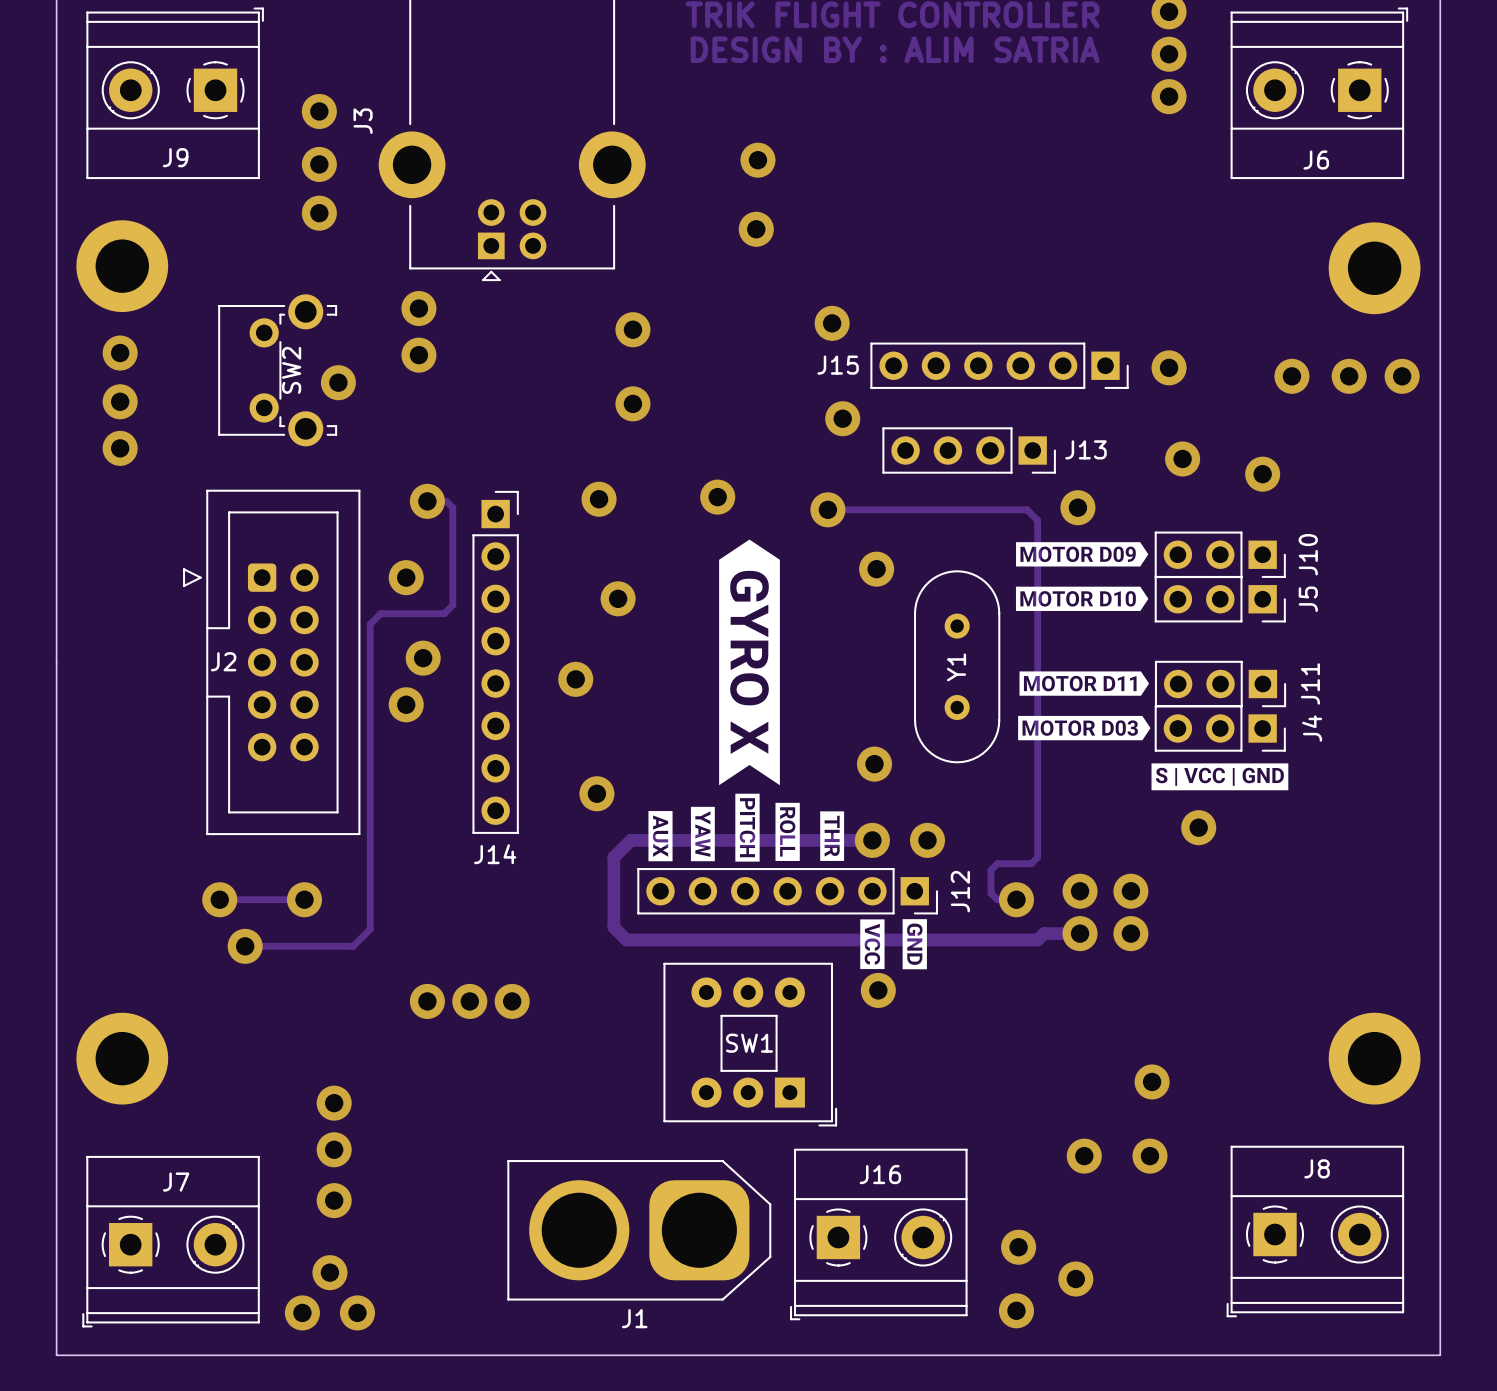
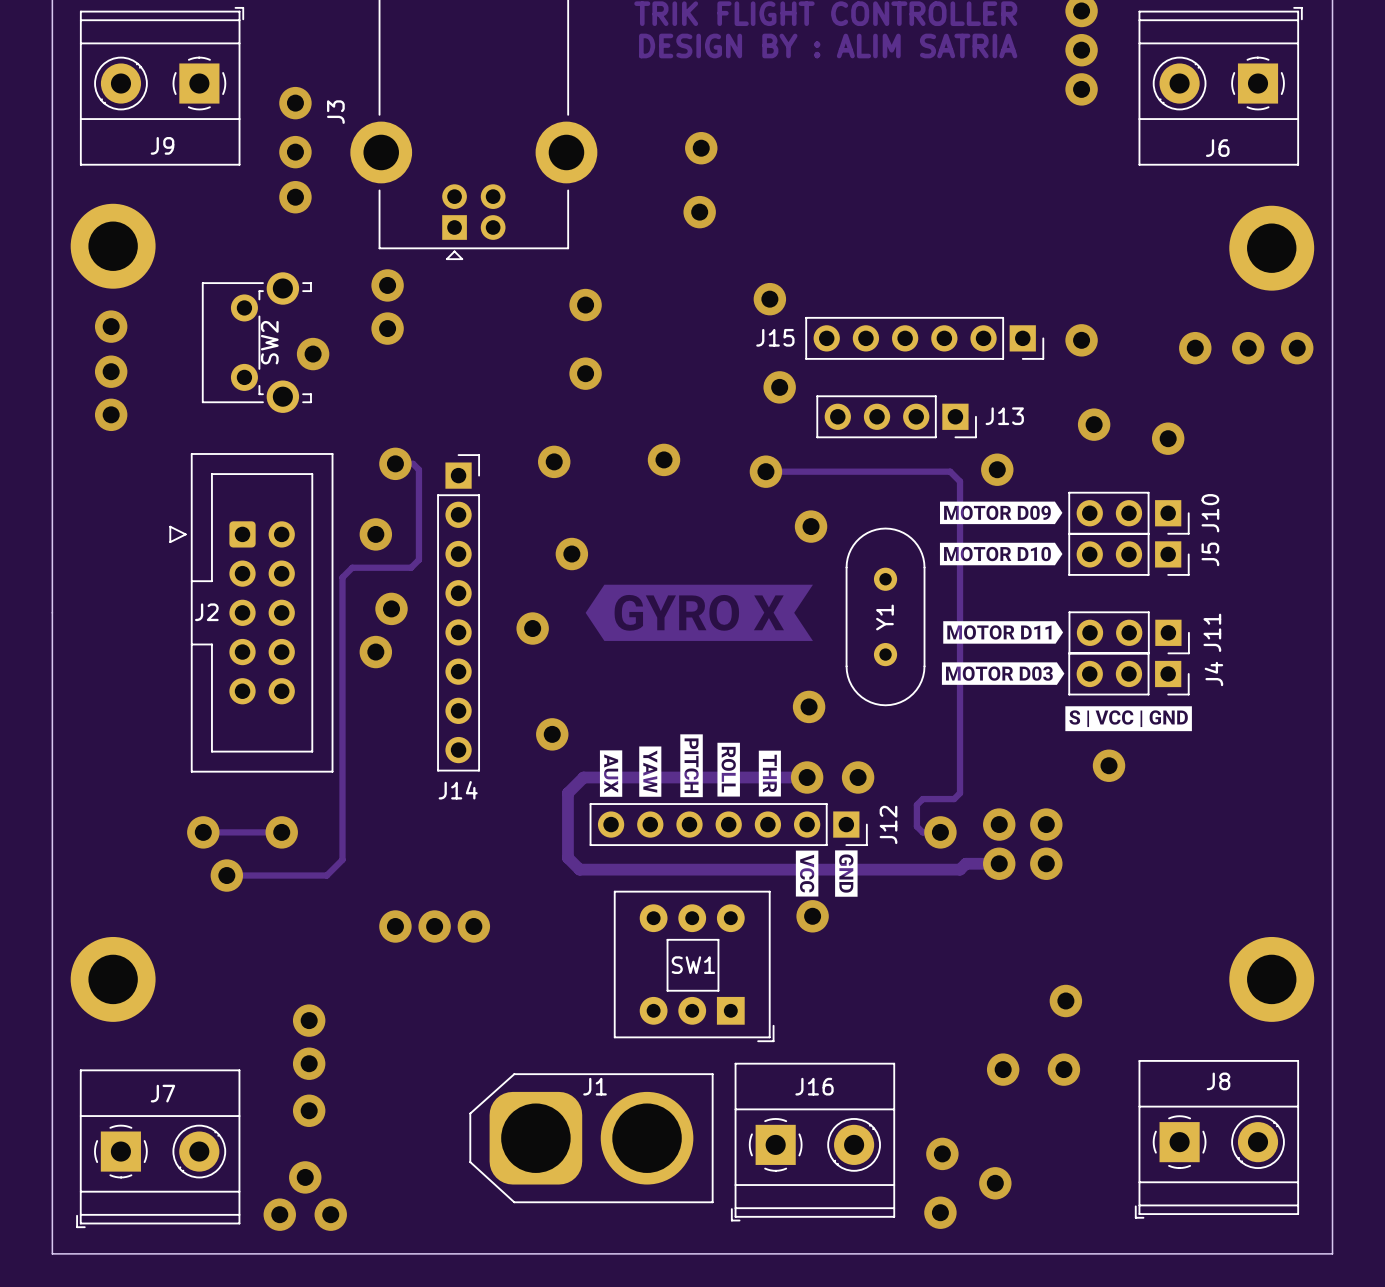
drawing shape: [719, 539, 780, 786] -> [585, 584, 813, 641]
J1 rotation: 0° (639, 1230) -> 180° (591, 1138)
J1 name position: J1 (634, 1318) -> J1 (595, 1086)

